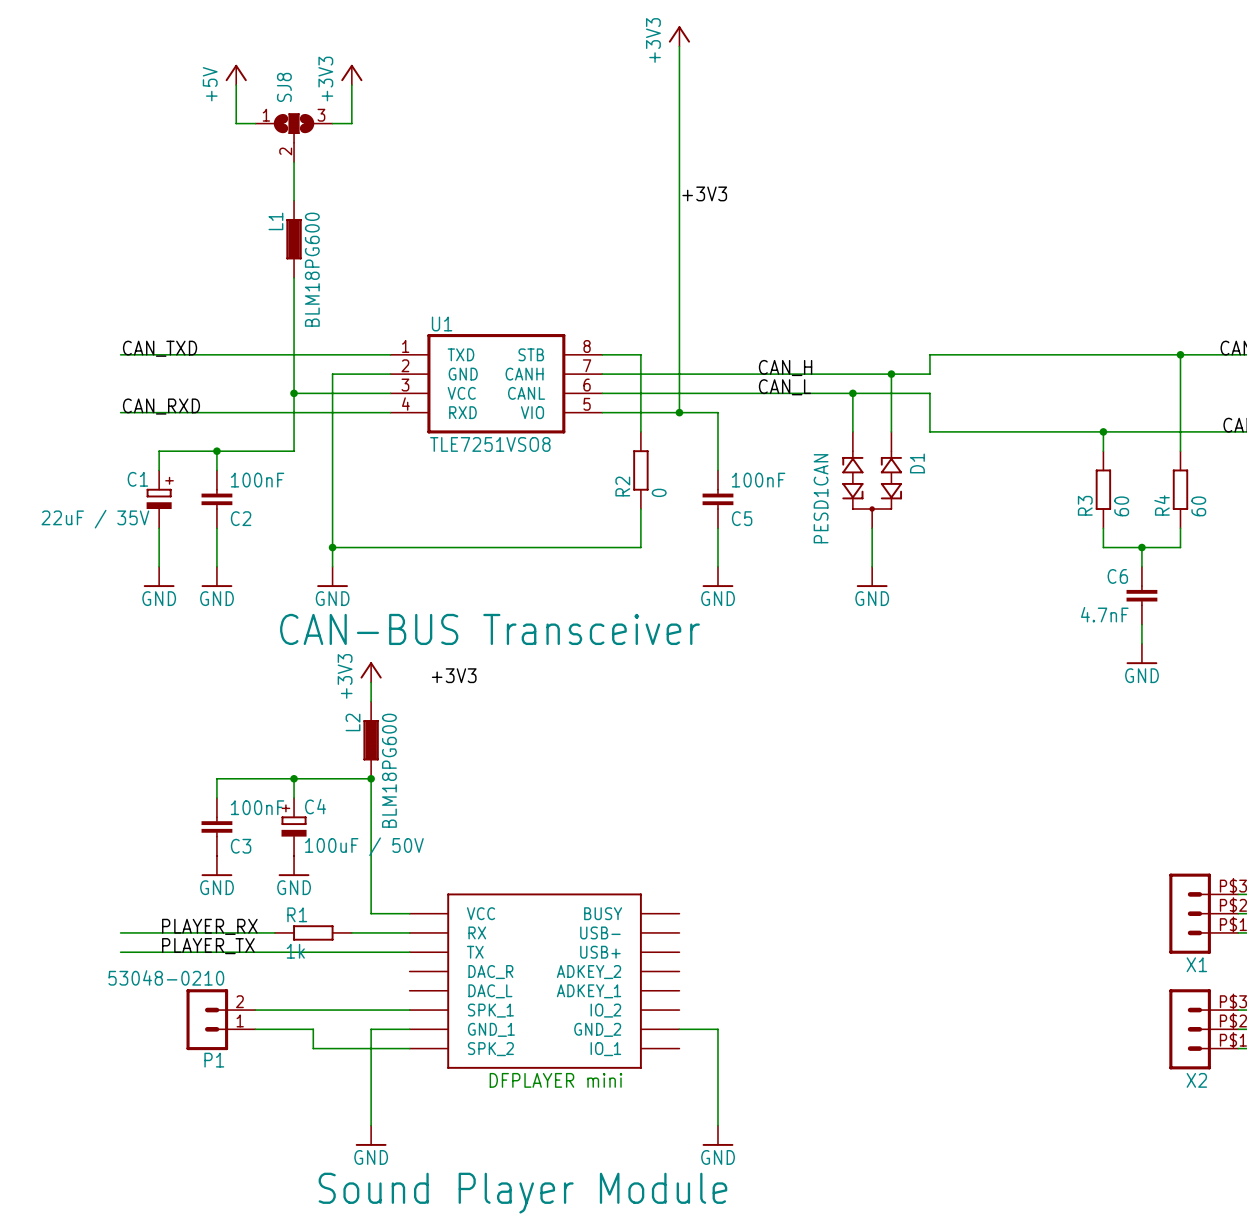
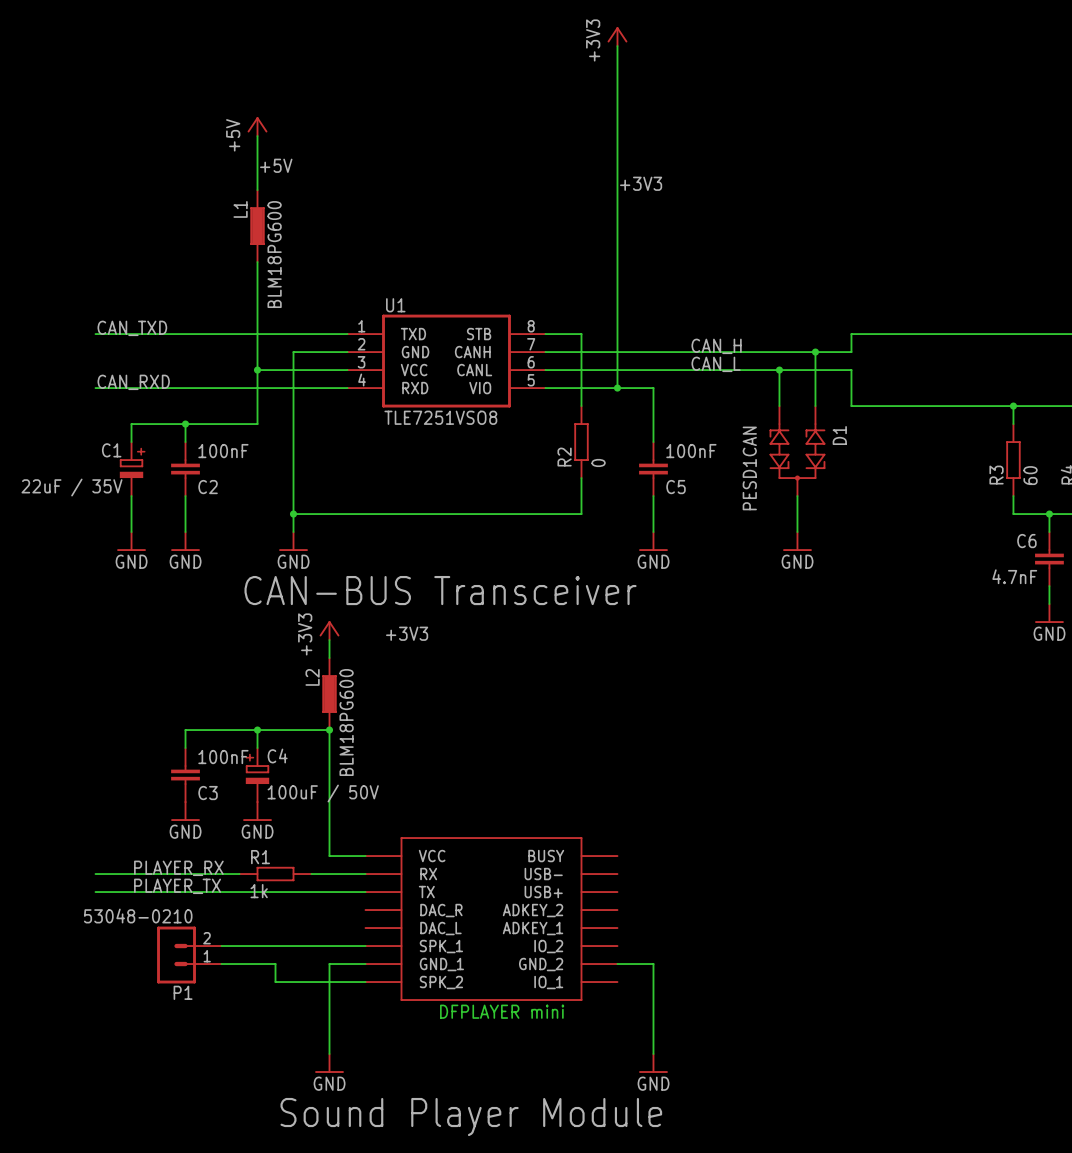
power symbol position: +5V (236, 74) -> +5V (257, 126)
power symbol: +3V3 (351, 74) -> none
wire: (236, 85) (236, 123) (255, 123) -> none
wire: (351, 85) (351, 123) (332, 123) -> none
SJ8: (294, 137) -> none
label: none -> +5V (276, 165)

